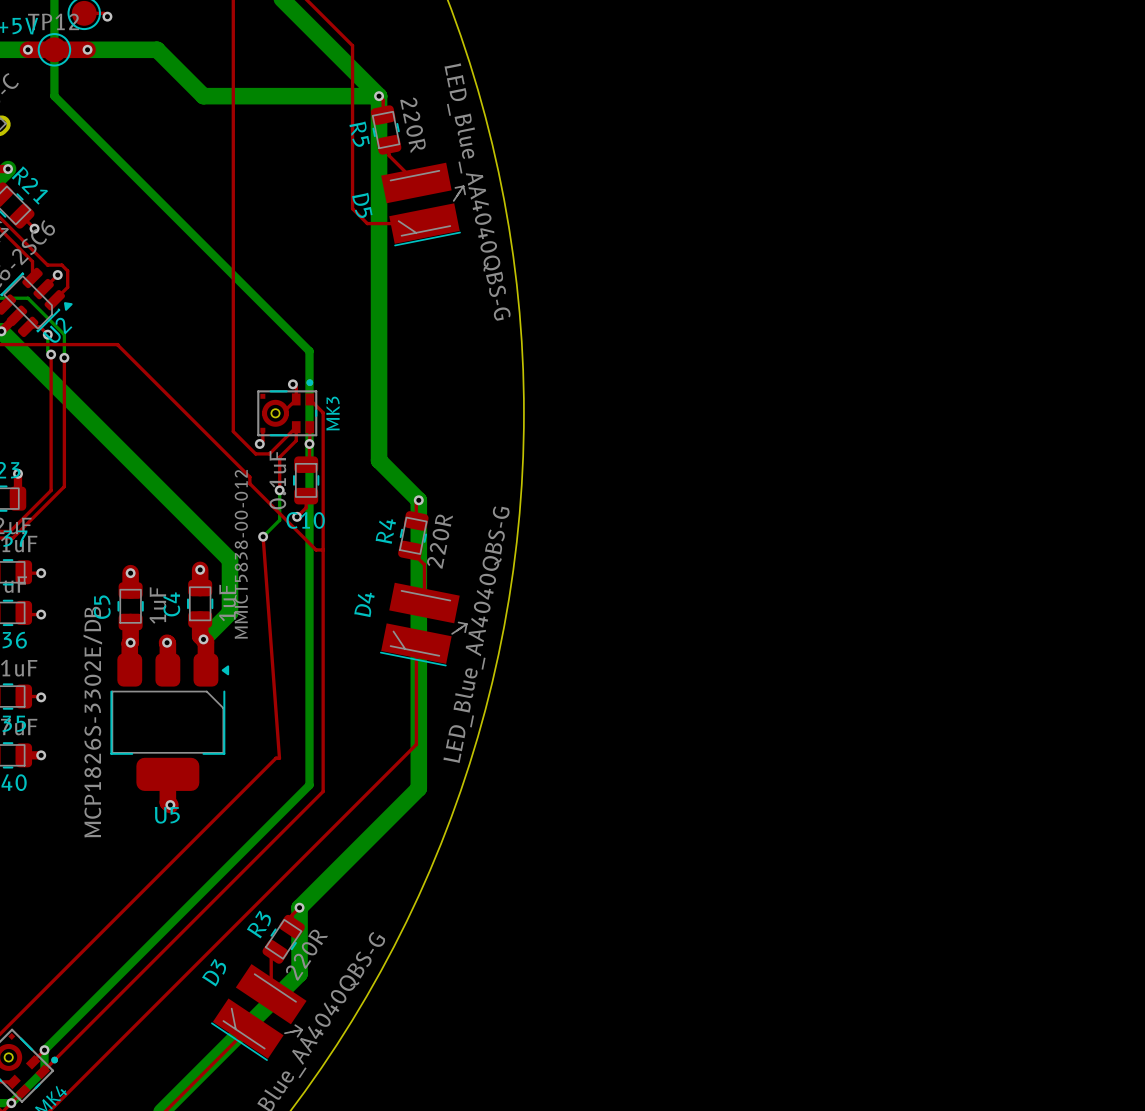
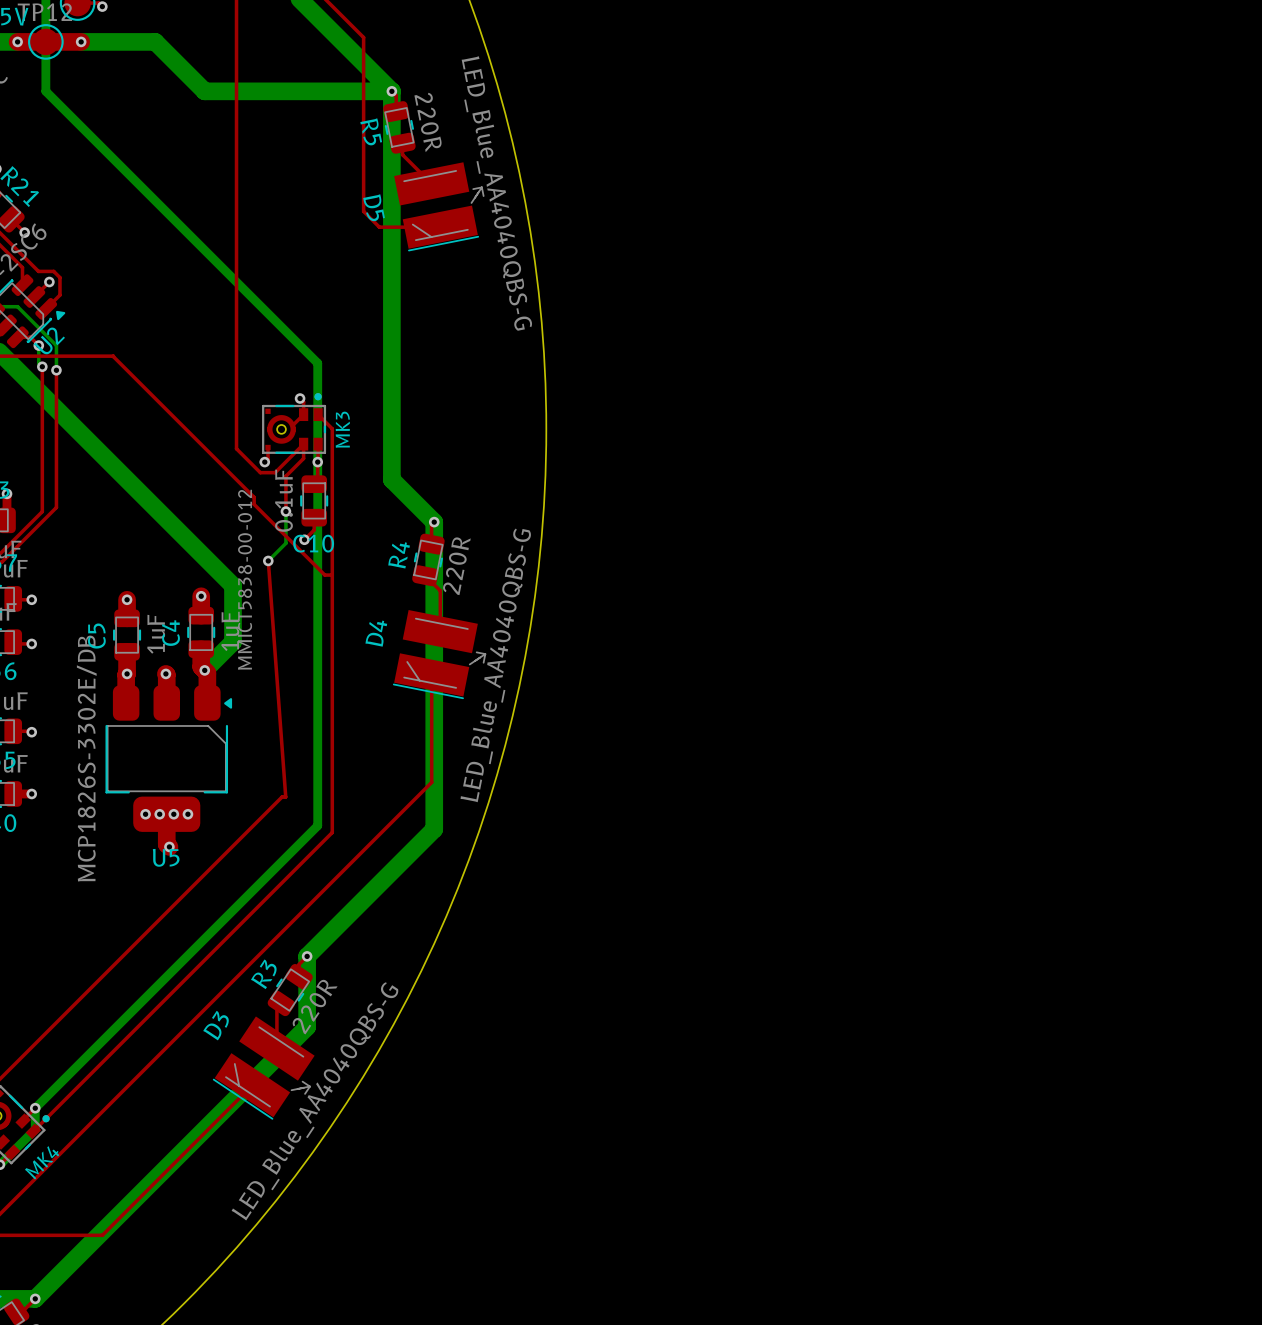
via: none -> (145, 814)
via: none -> (159, 814)
via: none -> (173, 814)
via: none -> (187, 814)

